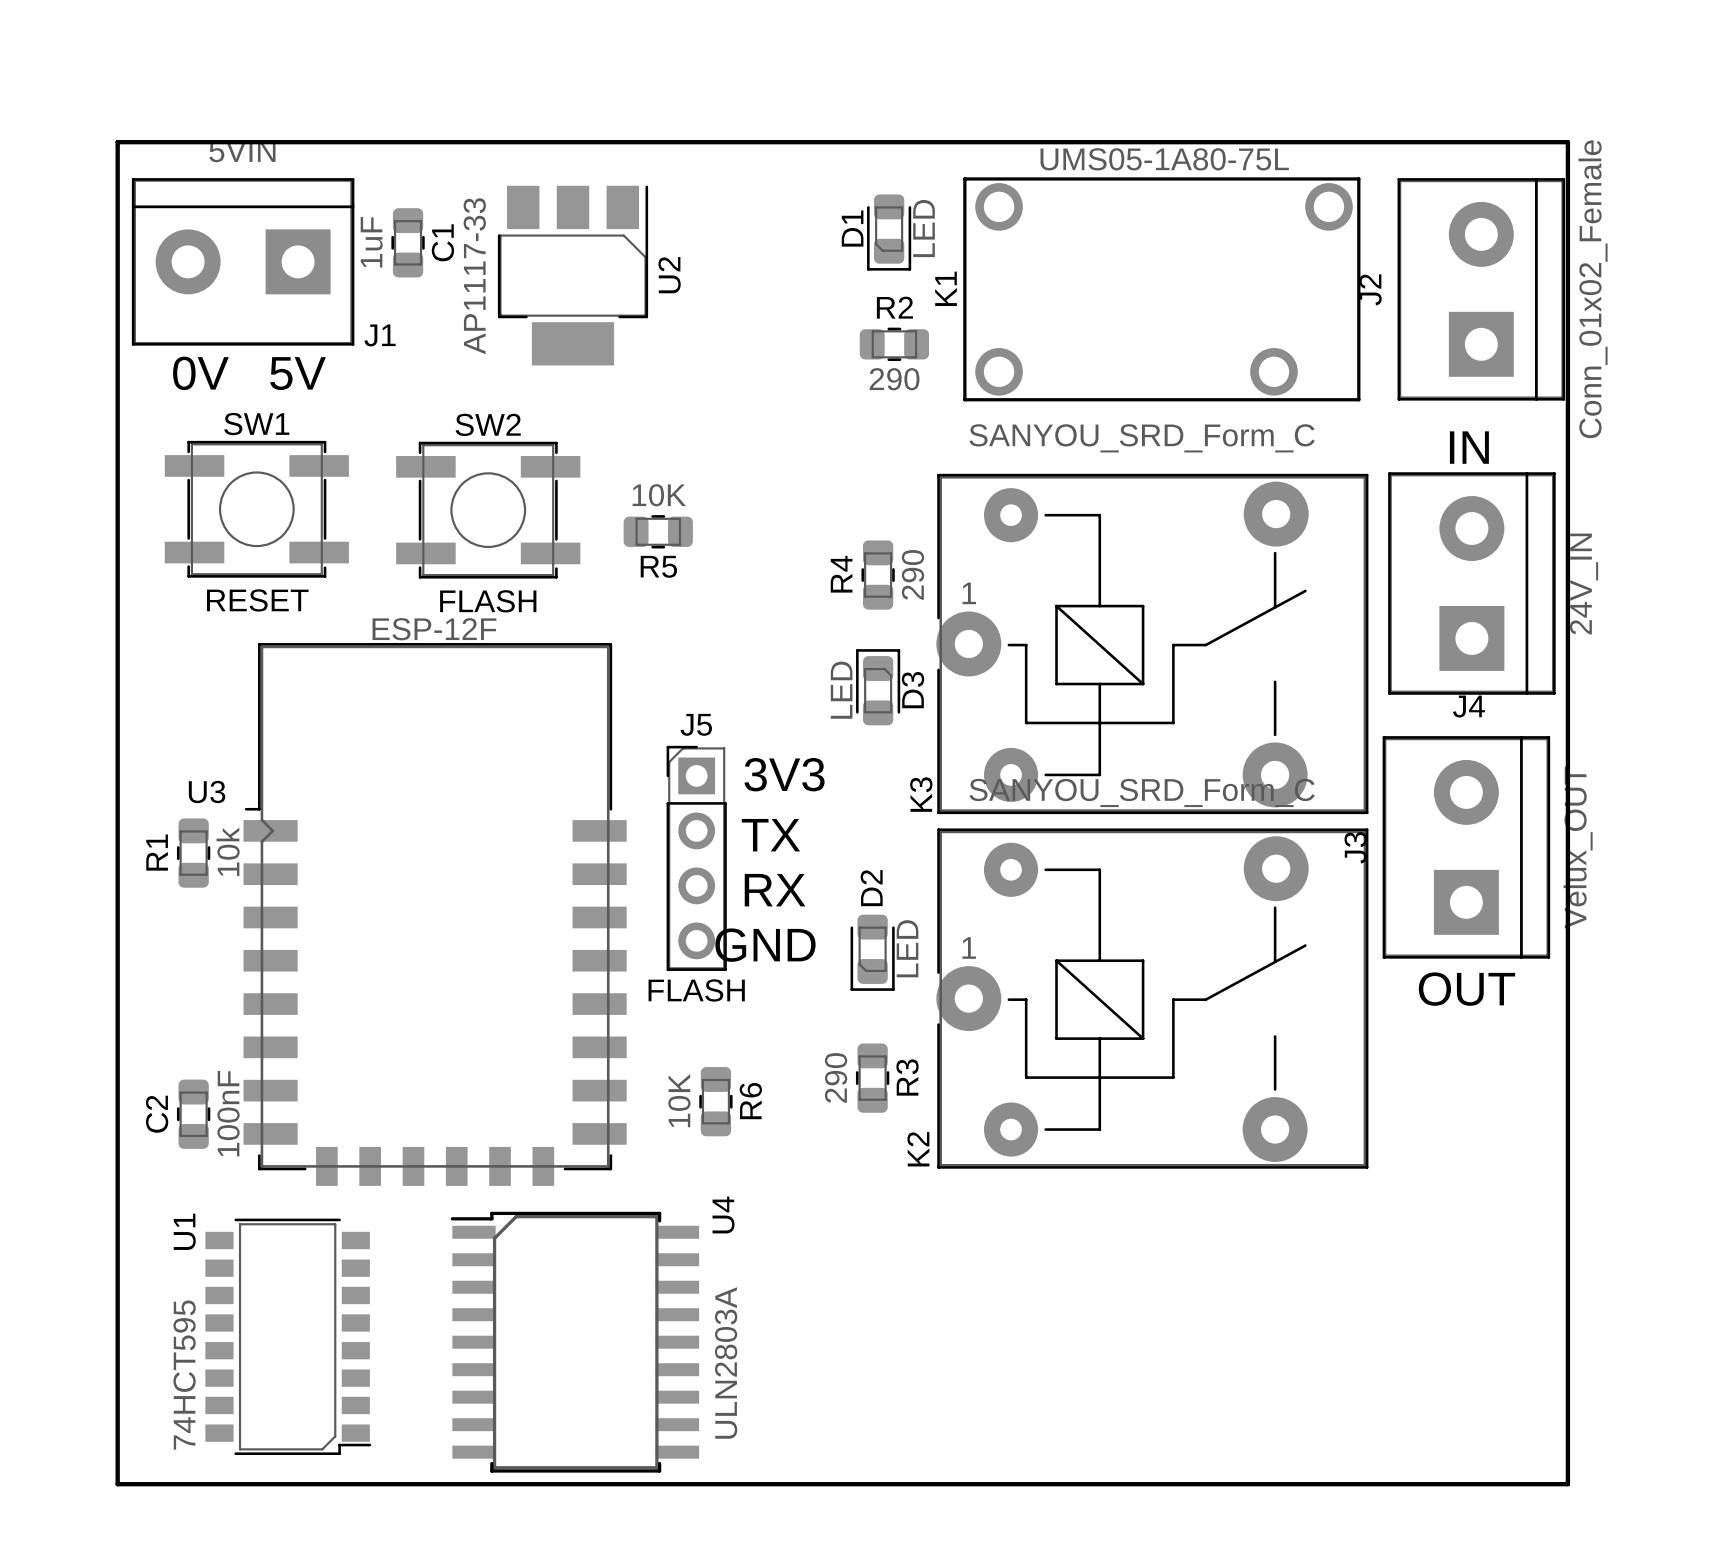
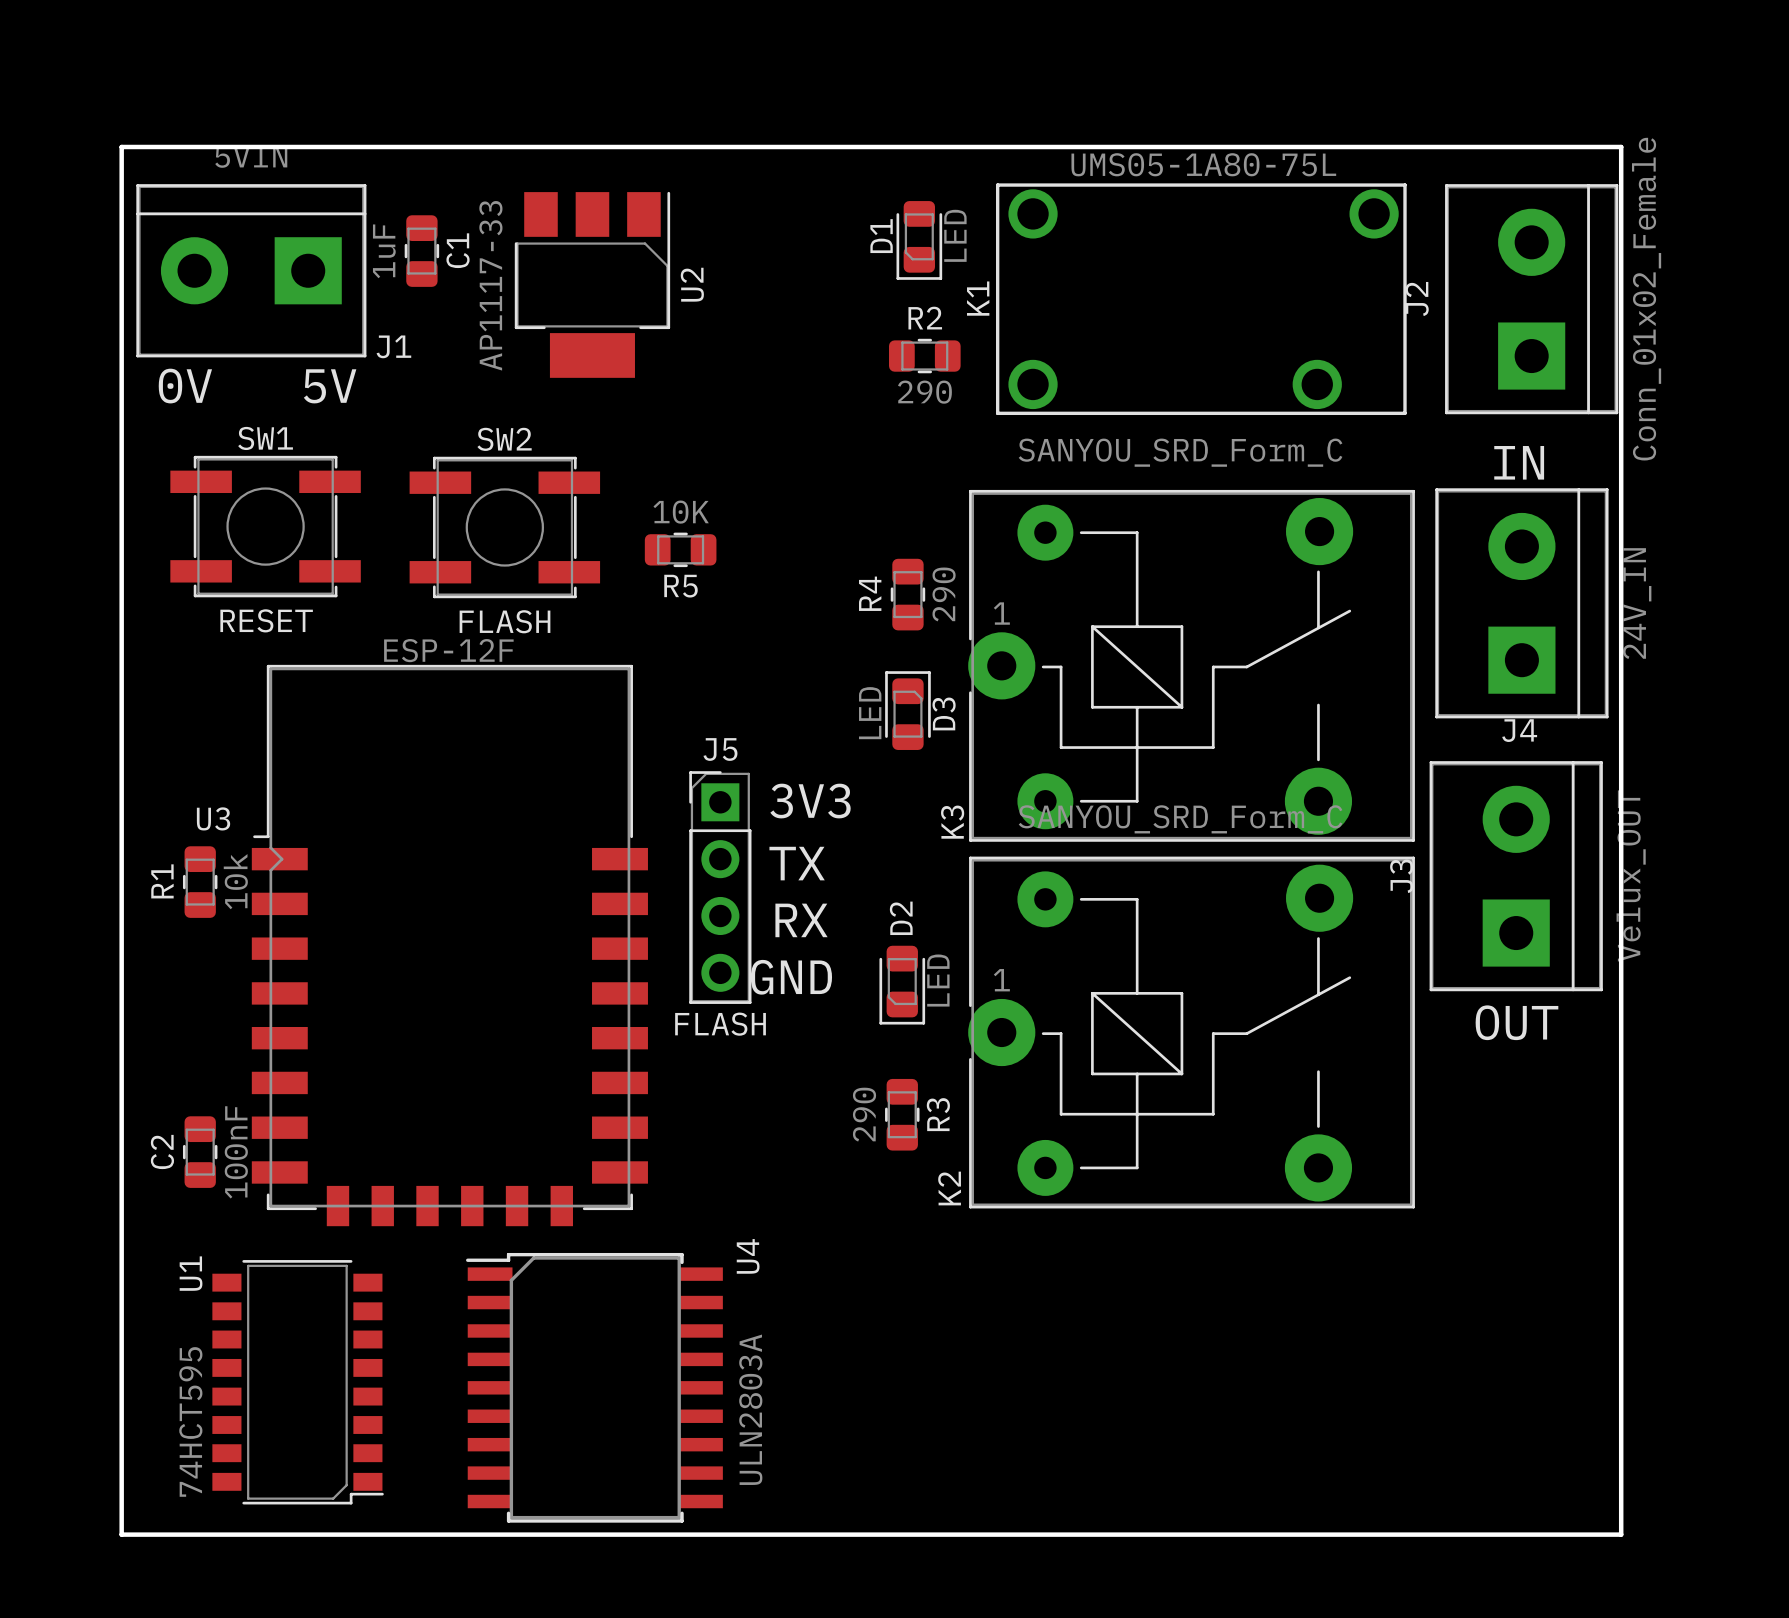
R6: 10K (715, 1101) -> none

